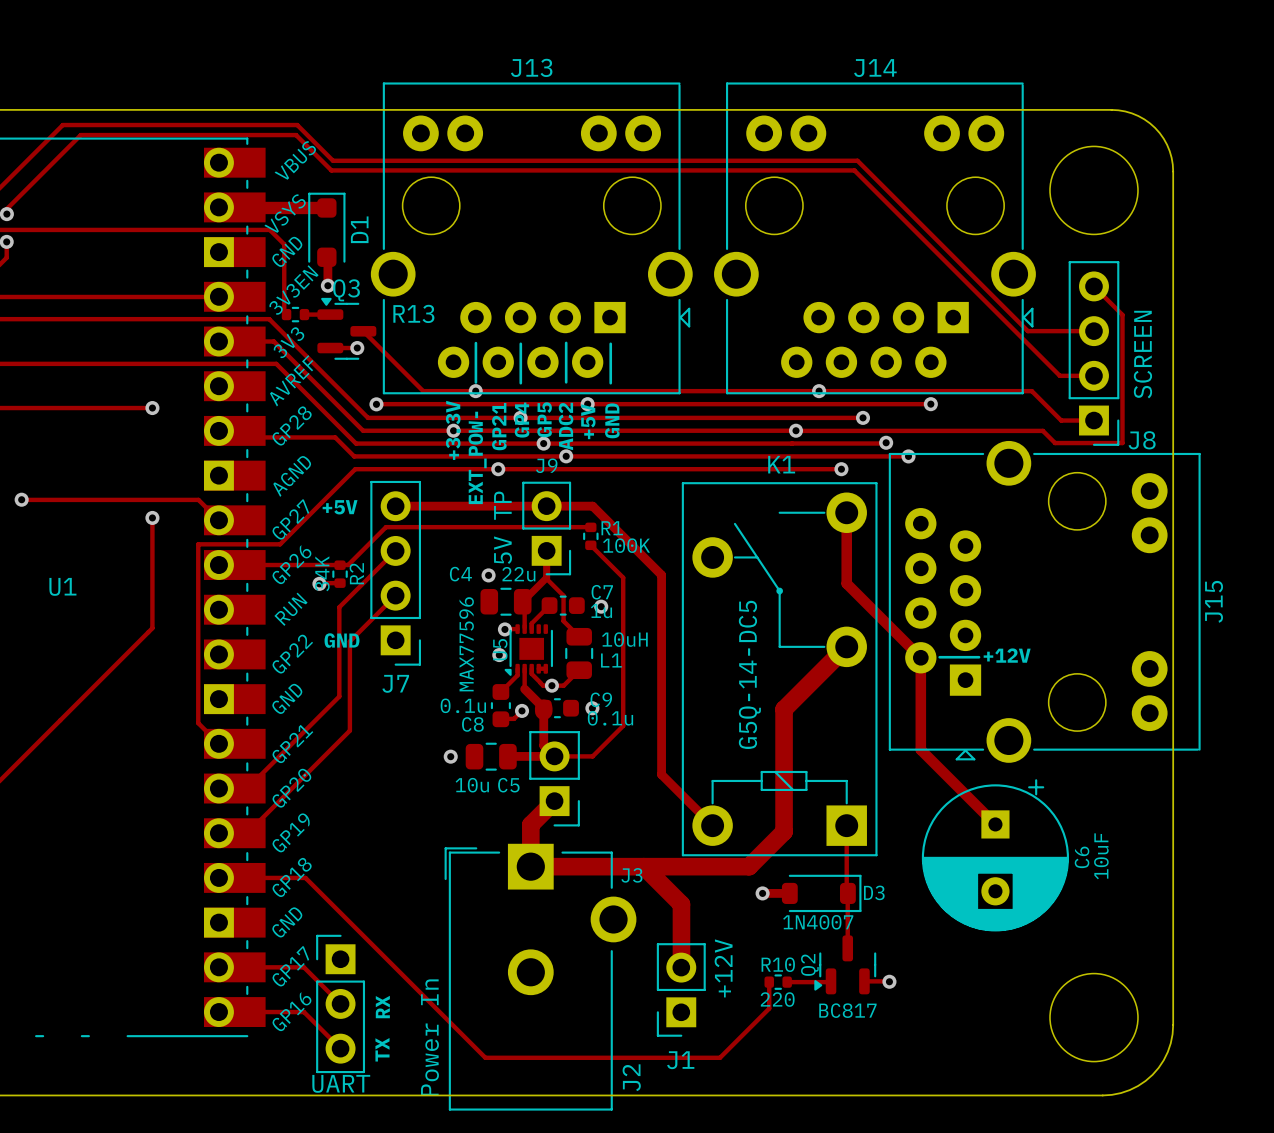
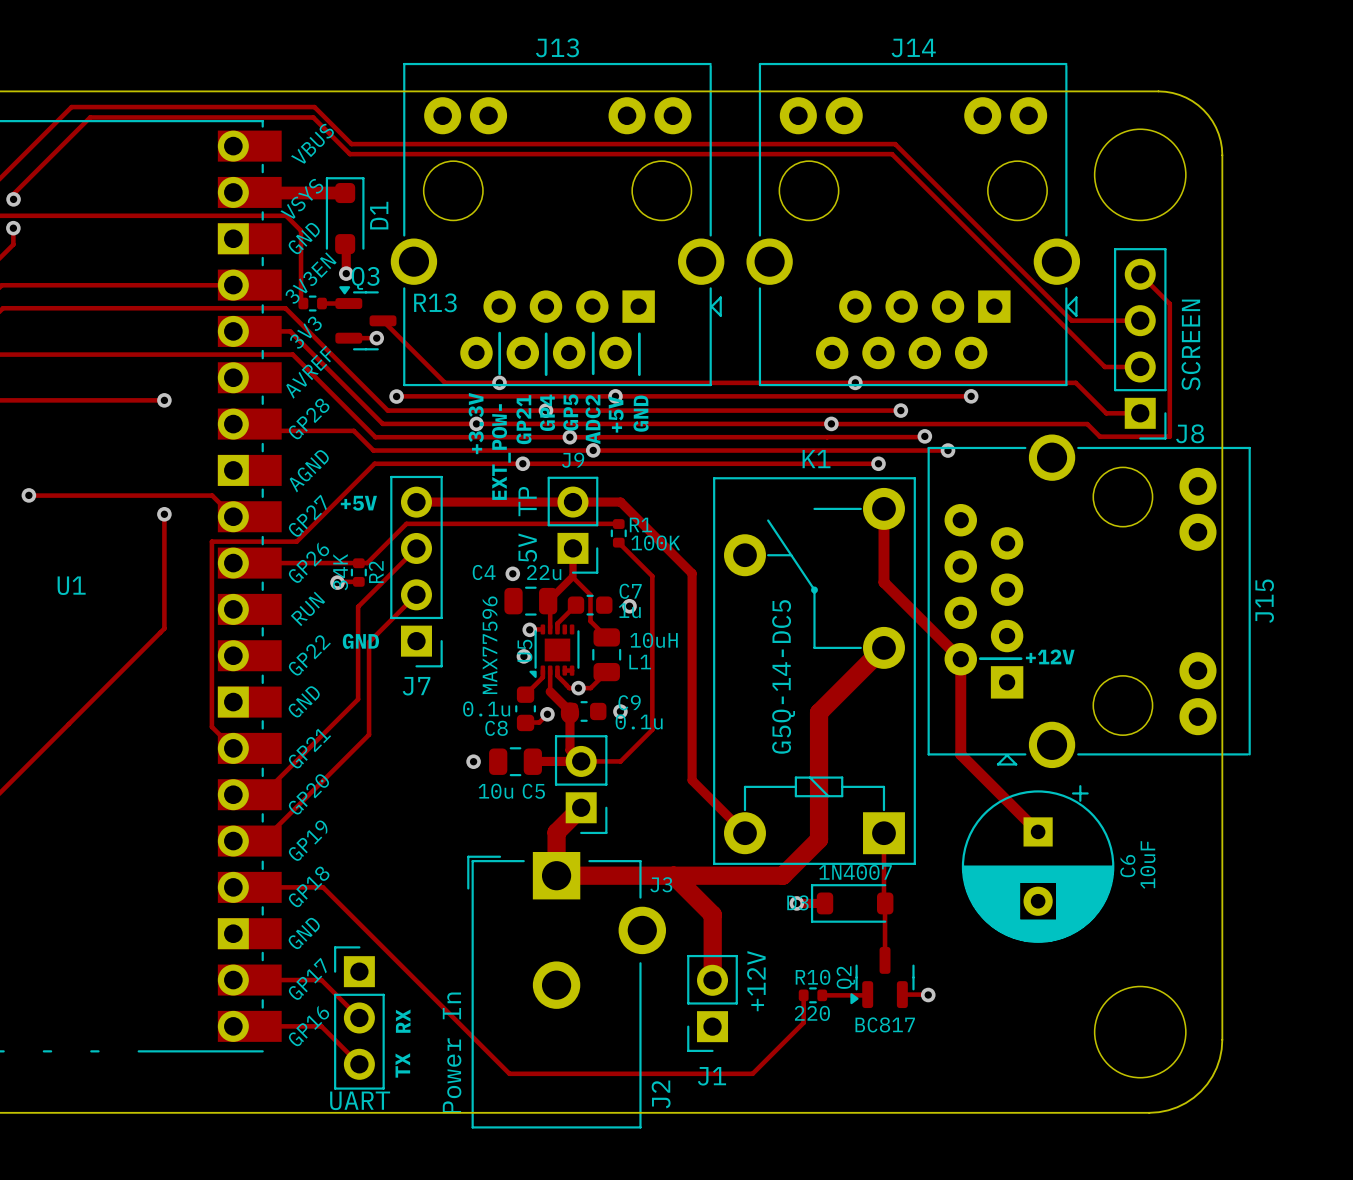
D3 rotation: 0° (821, 893) -> 180° (852, 903)

